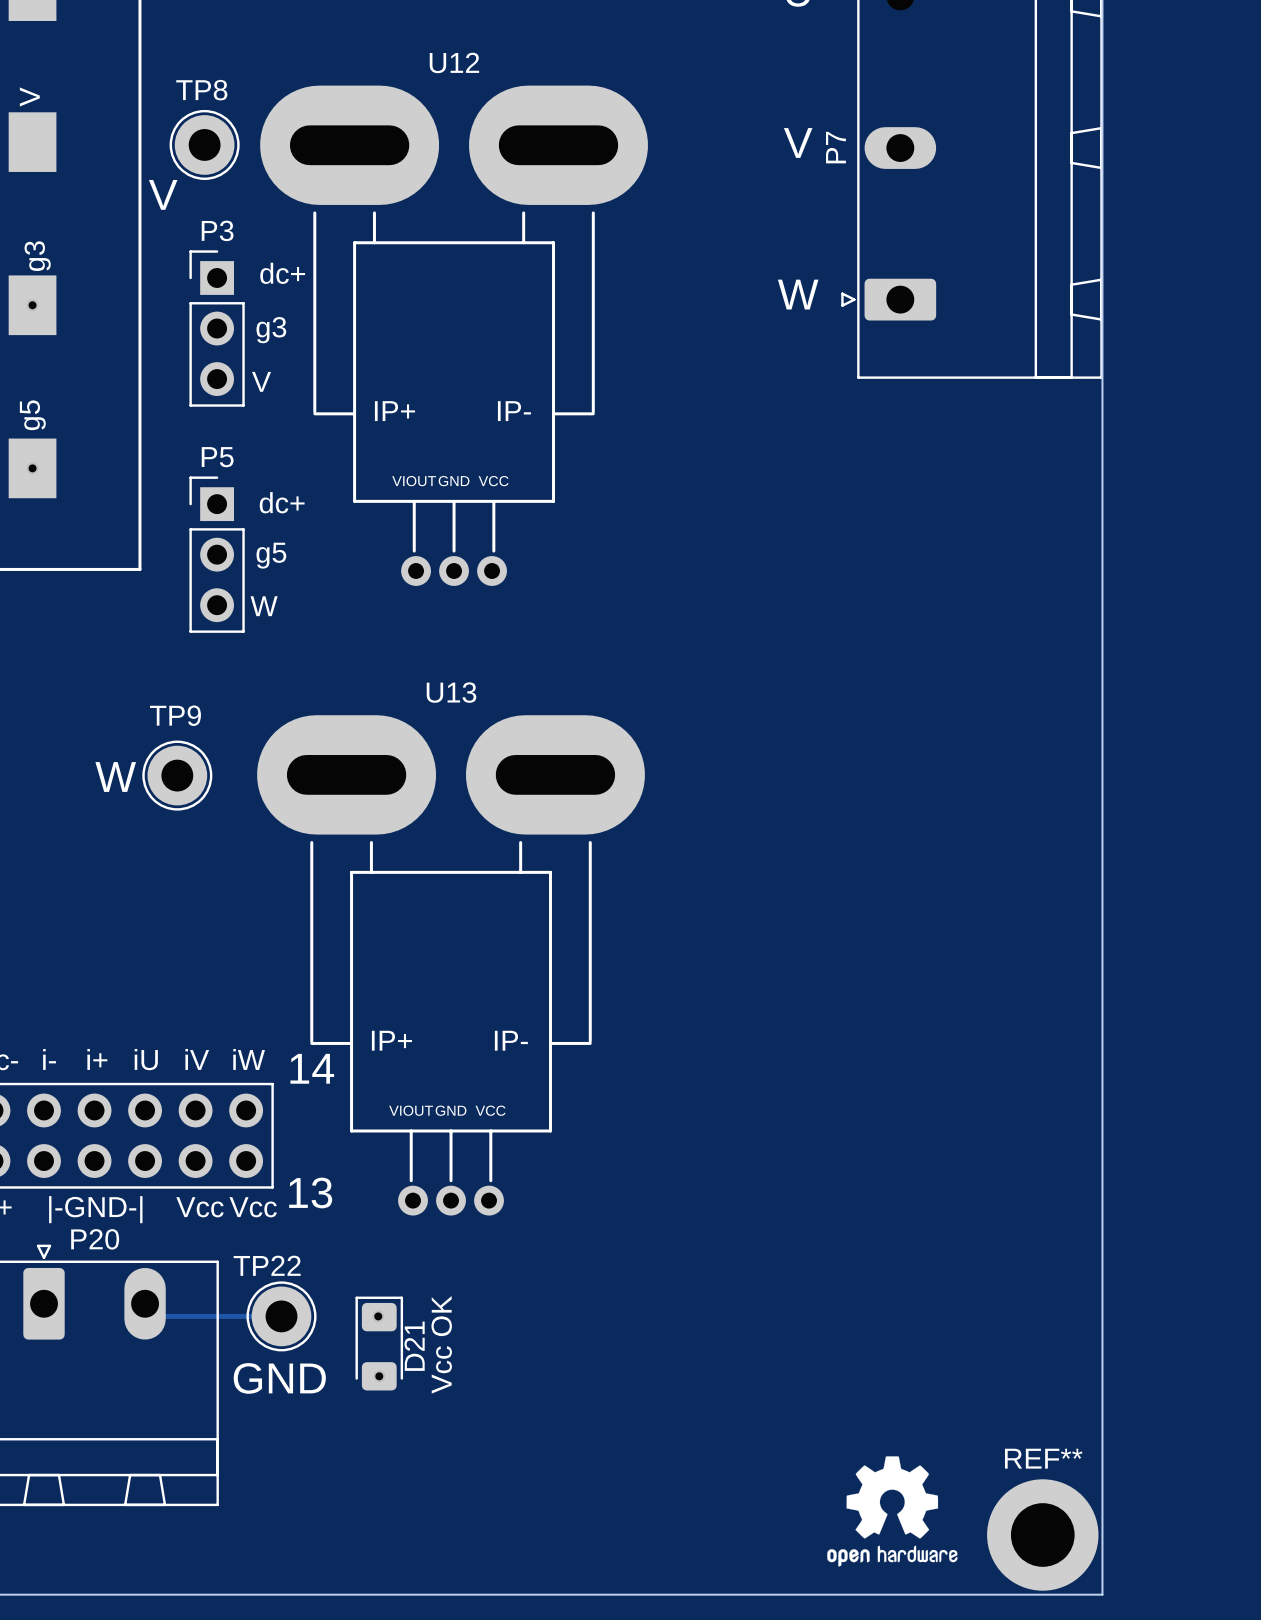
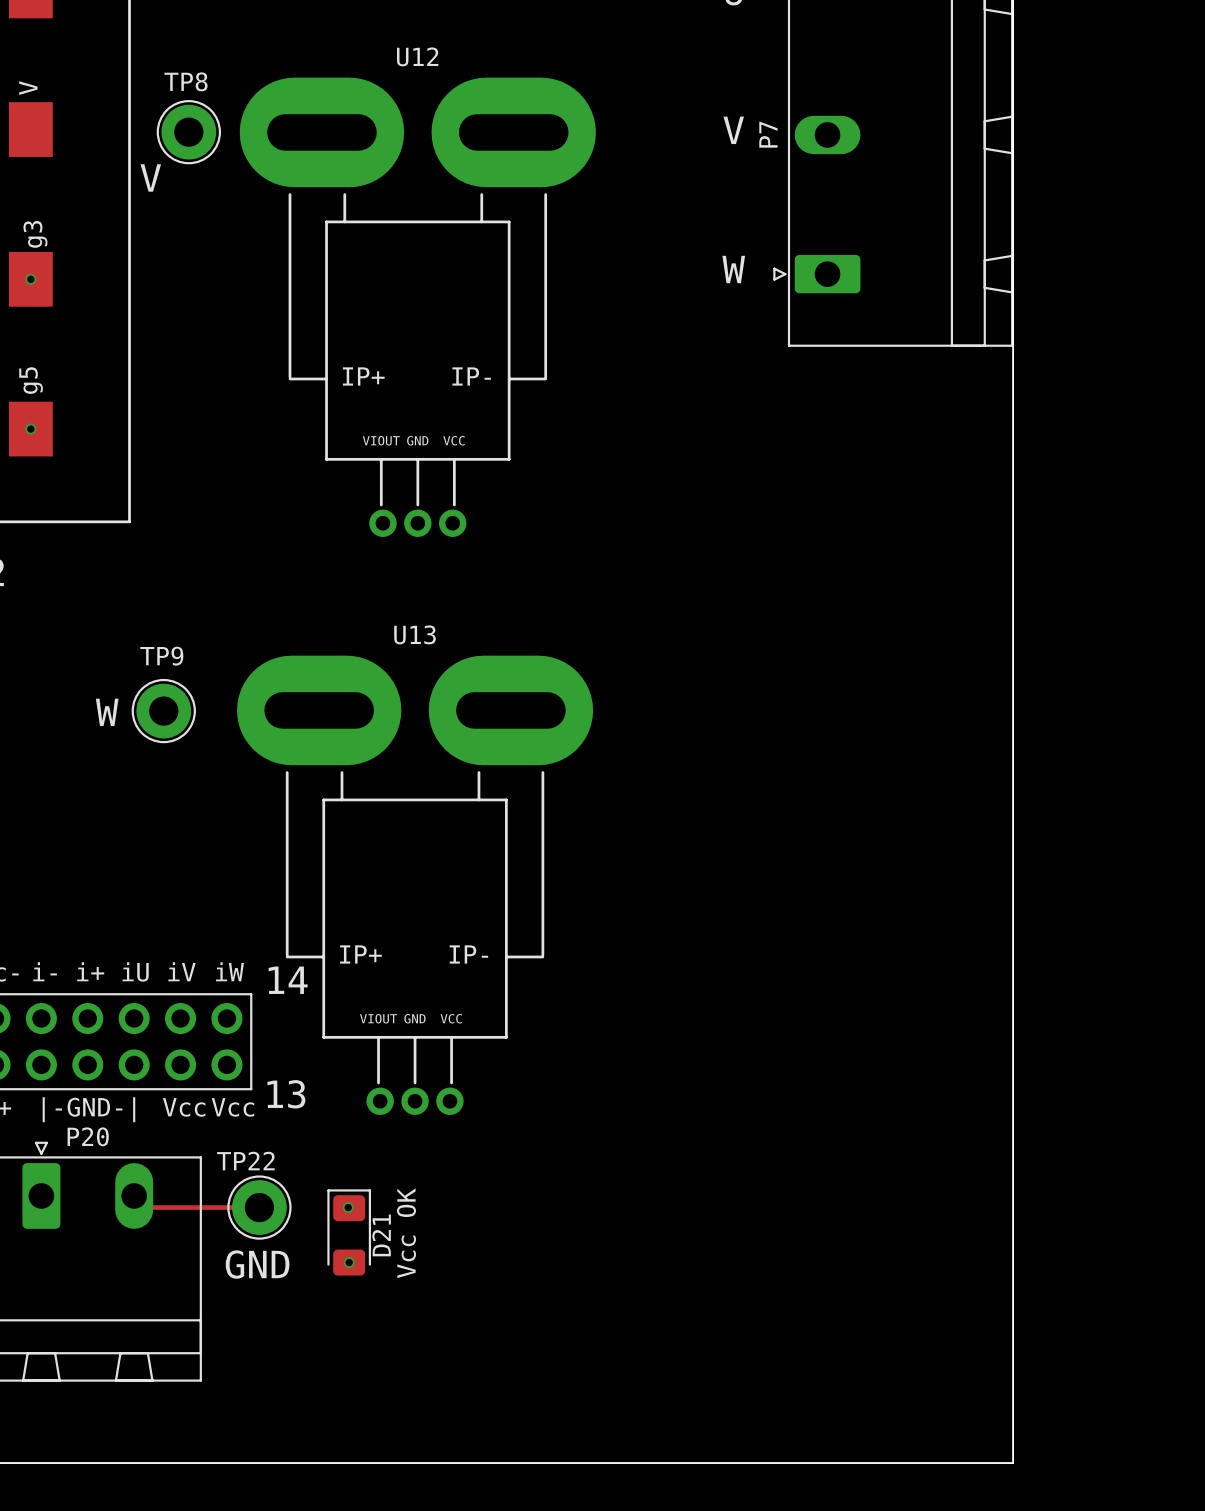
text: dc+ (282, 273) -> none
P3: (217, 328) -> none
text: g3 (271, 330) -> none
text: V (261, 381) -> none
text: dc+ (282, 502) -> none
P5: (217, 554) -> none
text: g5 (271, 555) -> none
text: W (264, 606) -> none
drawing: [827, 1456, 958, 1567] -> none
REF**: (1042, 1535) -> none

